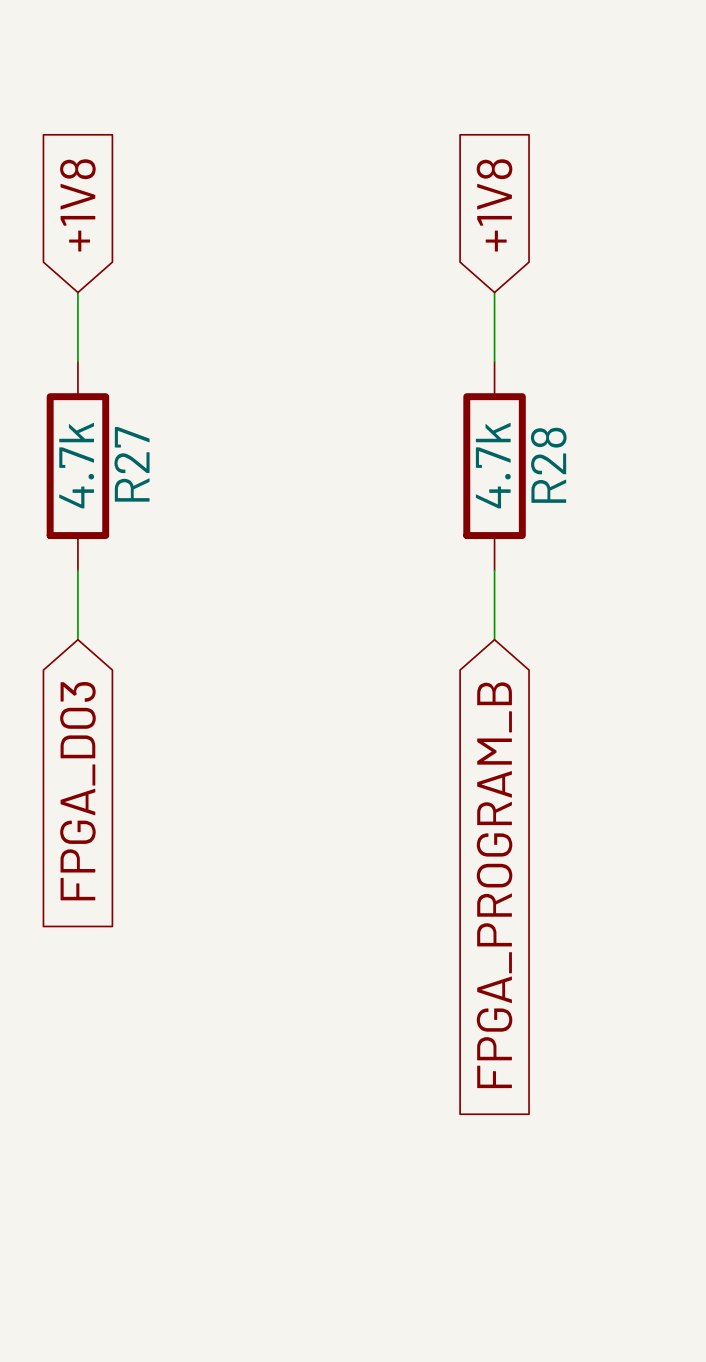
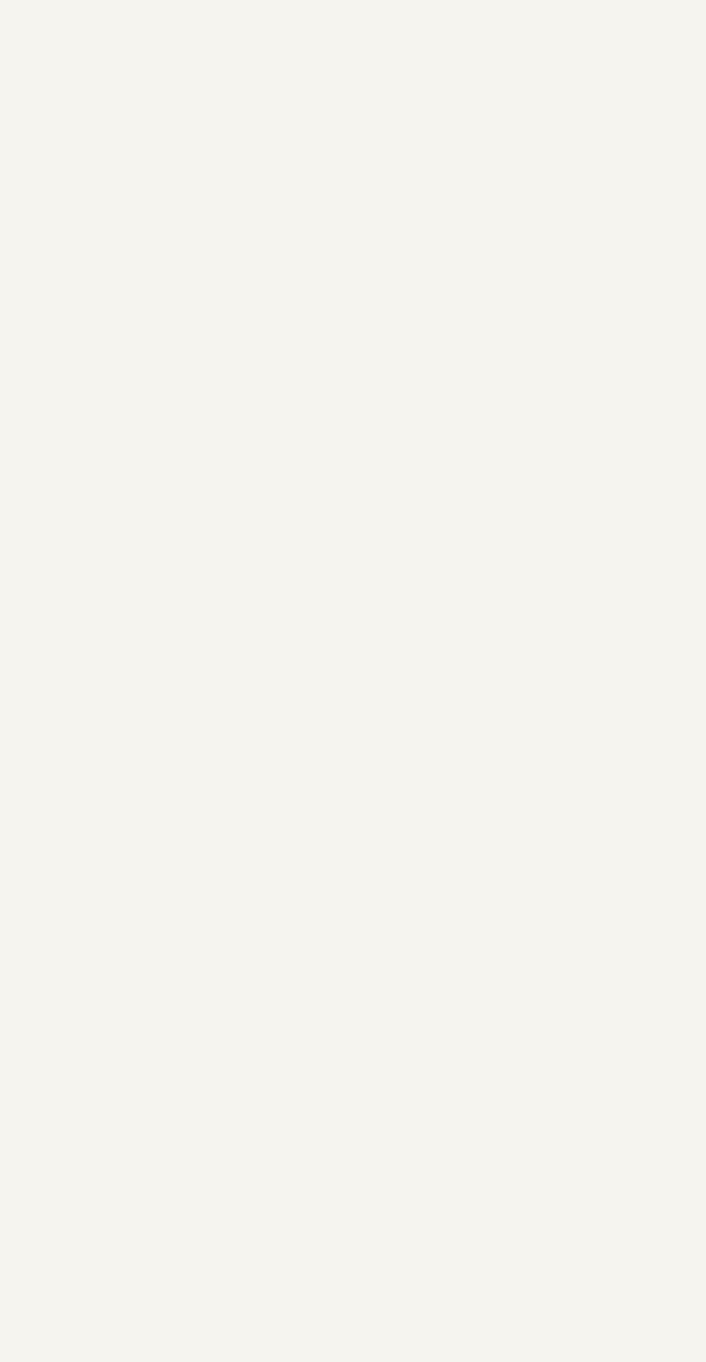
global label: +1V8 (77, 205) -> none
global label: +1V8 (494, 205) -> none
wire: (77, 292) (77, 361) -> none
wire: (494, 292) (494, 361) -> none
R27: 4.7k (77, 466) -> none
R28: 4.7k (494, 466) -> none
wire: (77, 570) (77, 639) -> none
wire: (494, 570) (494, 639) -> none
global label: FPGA_D03 (77, 791) -> none
global label: FPGA_PROGRAM_B (494, 885) -> none

